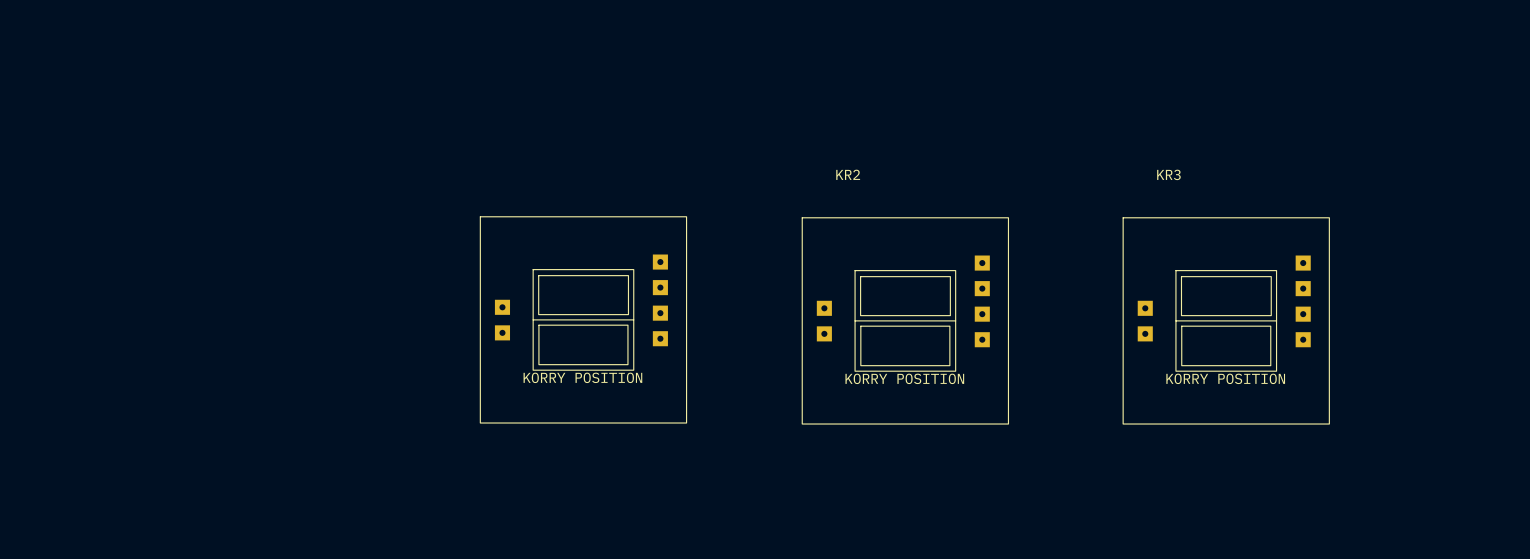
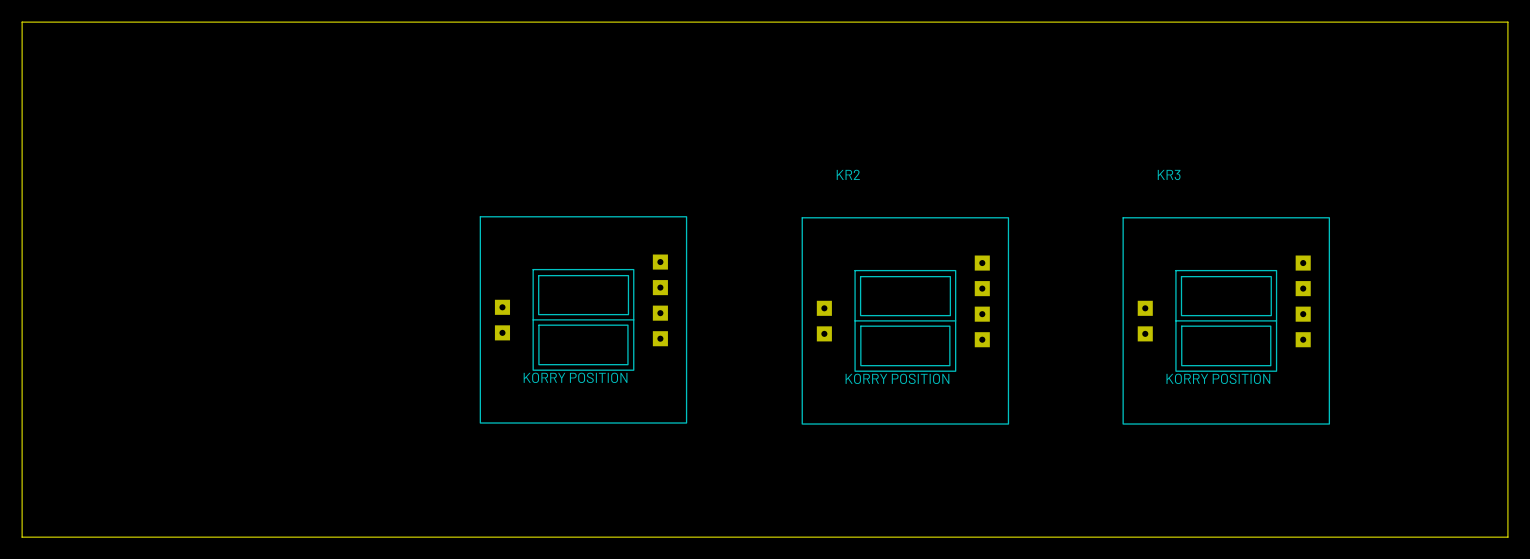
board edge: none -> (22, 22) (1507, 22) (1507, 537) (22, 537) (22, 22)

